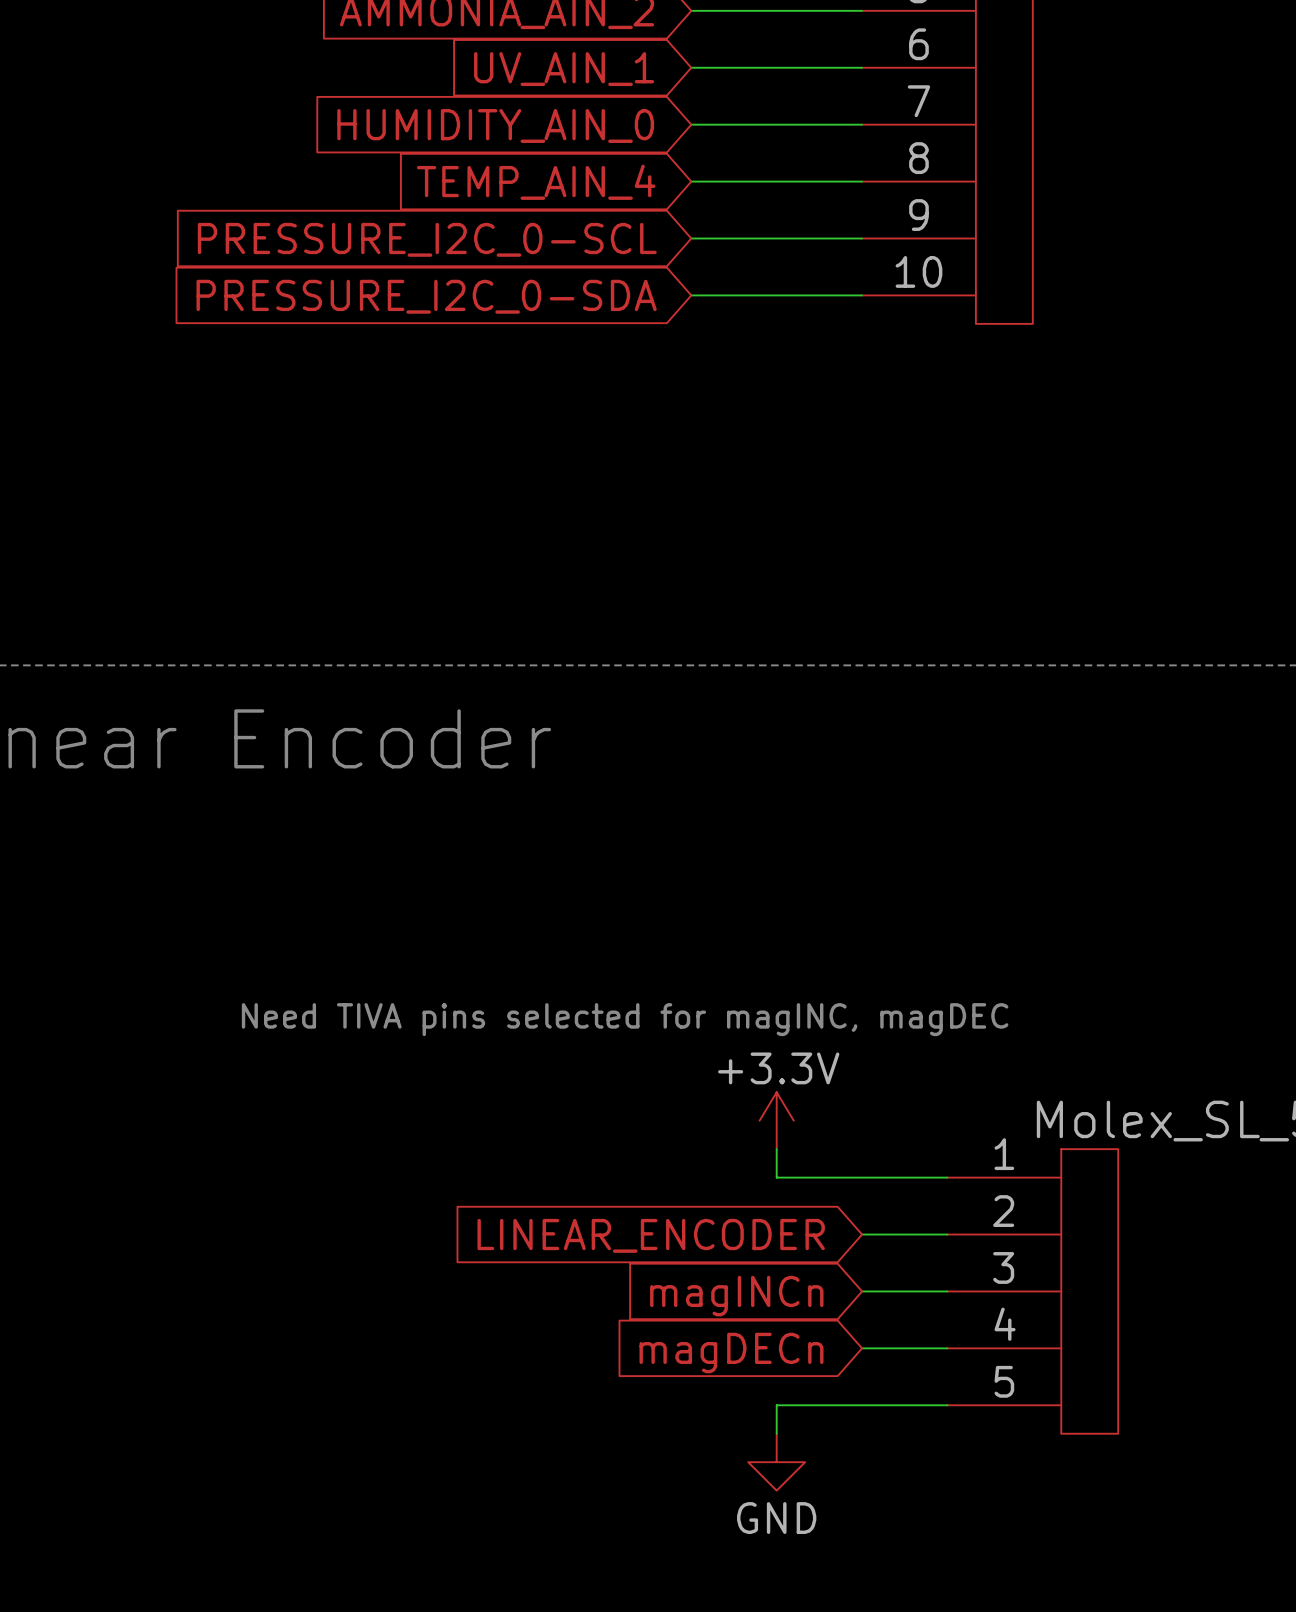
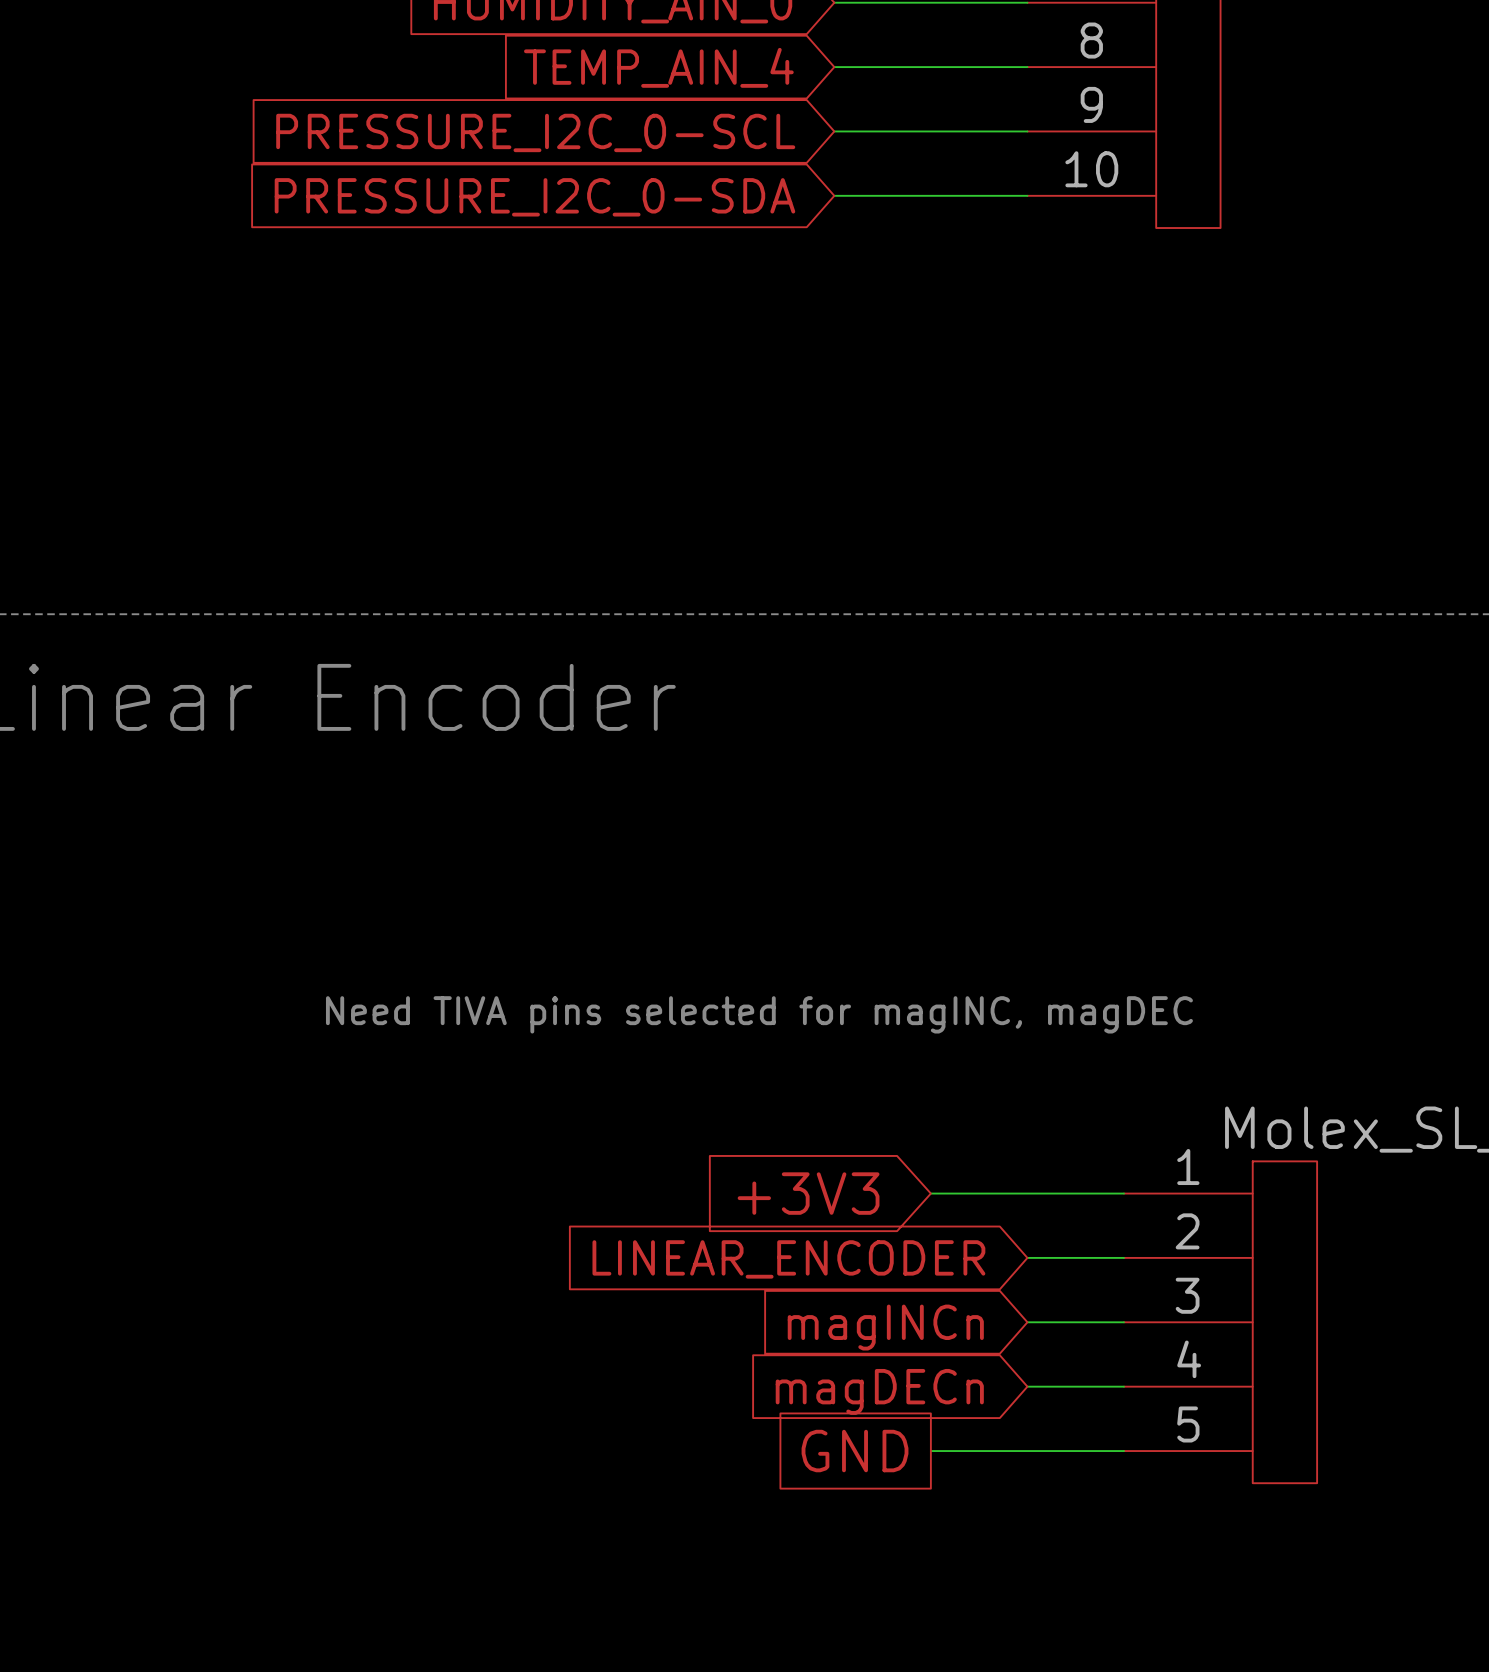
power symbol: +3.3V (776, 1120) -> none
wire: (776, 1149) (776, 1177) -> none
global label: none -> +3V3 (808, 1193)
global label: none -> GND (855, 1451)
power symbol: GND (776, 1462) -> none

